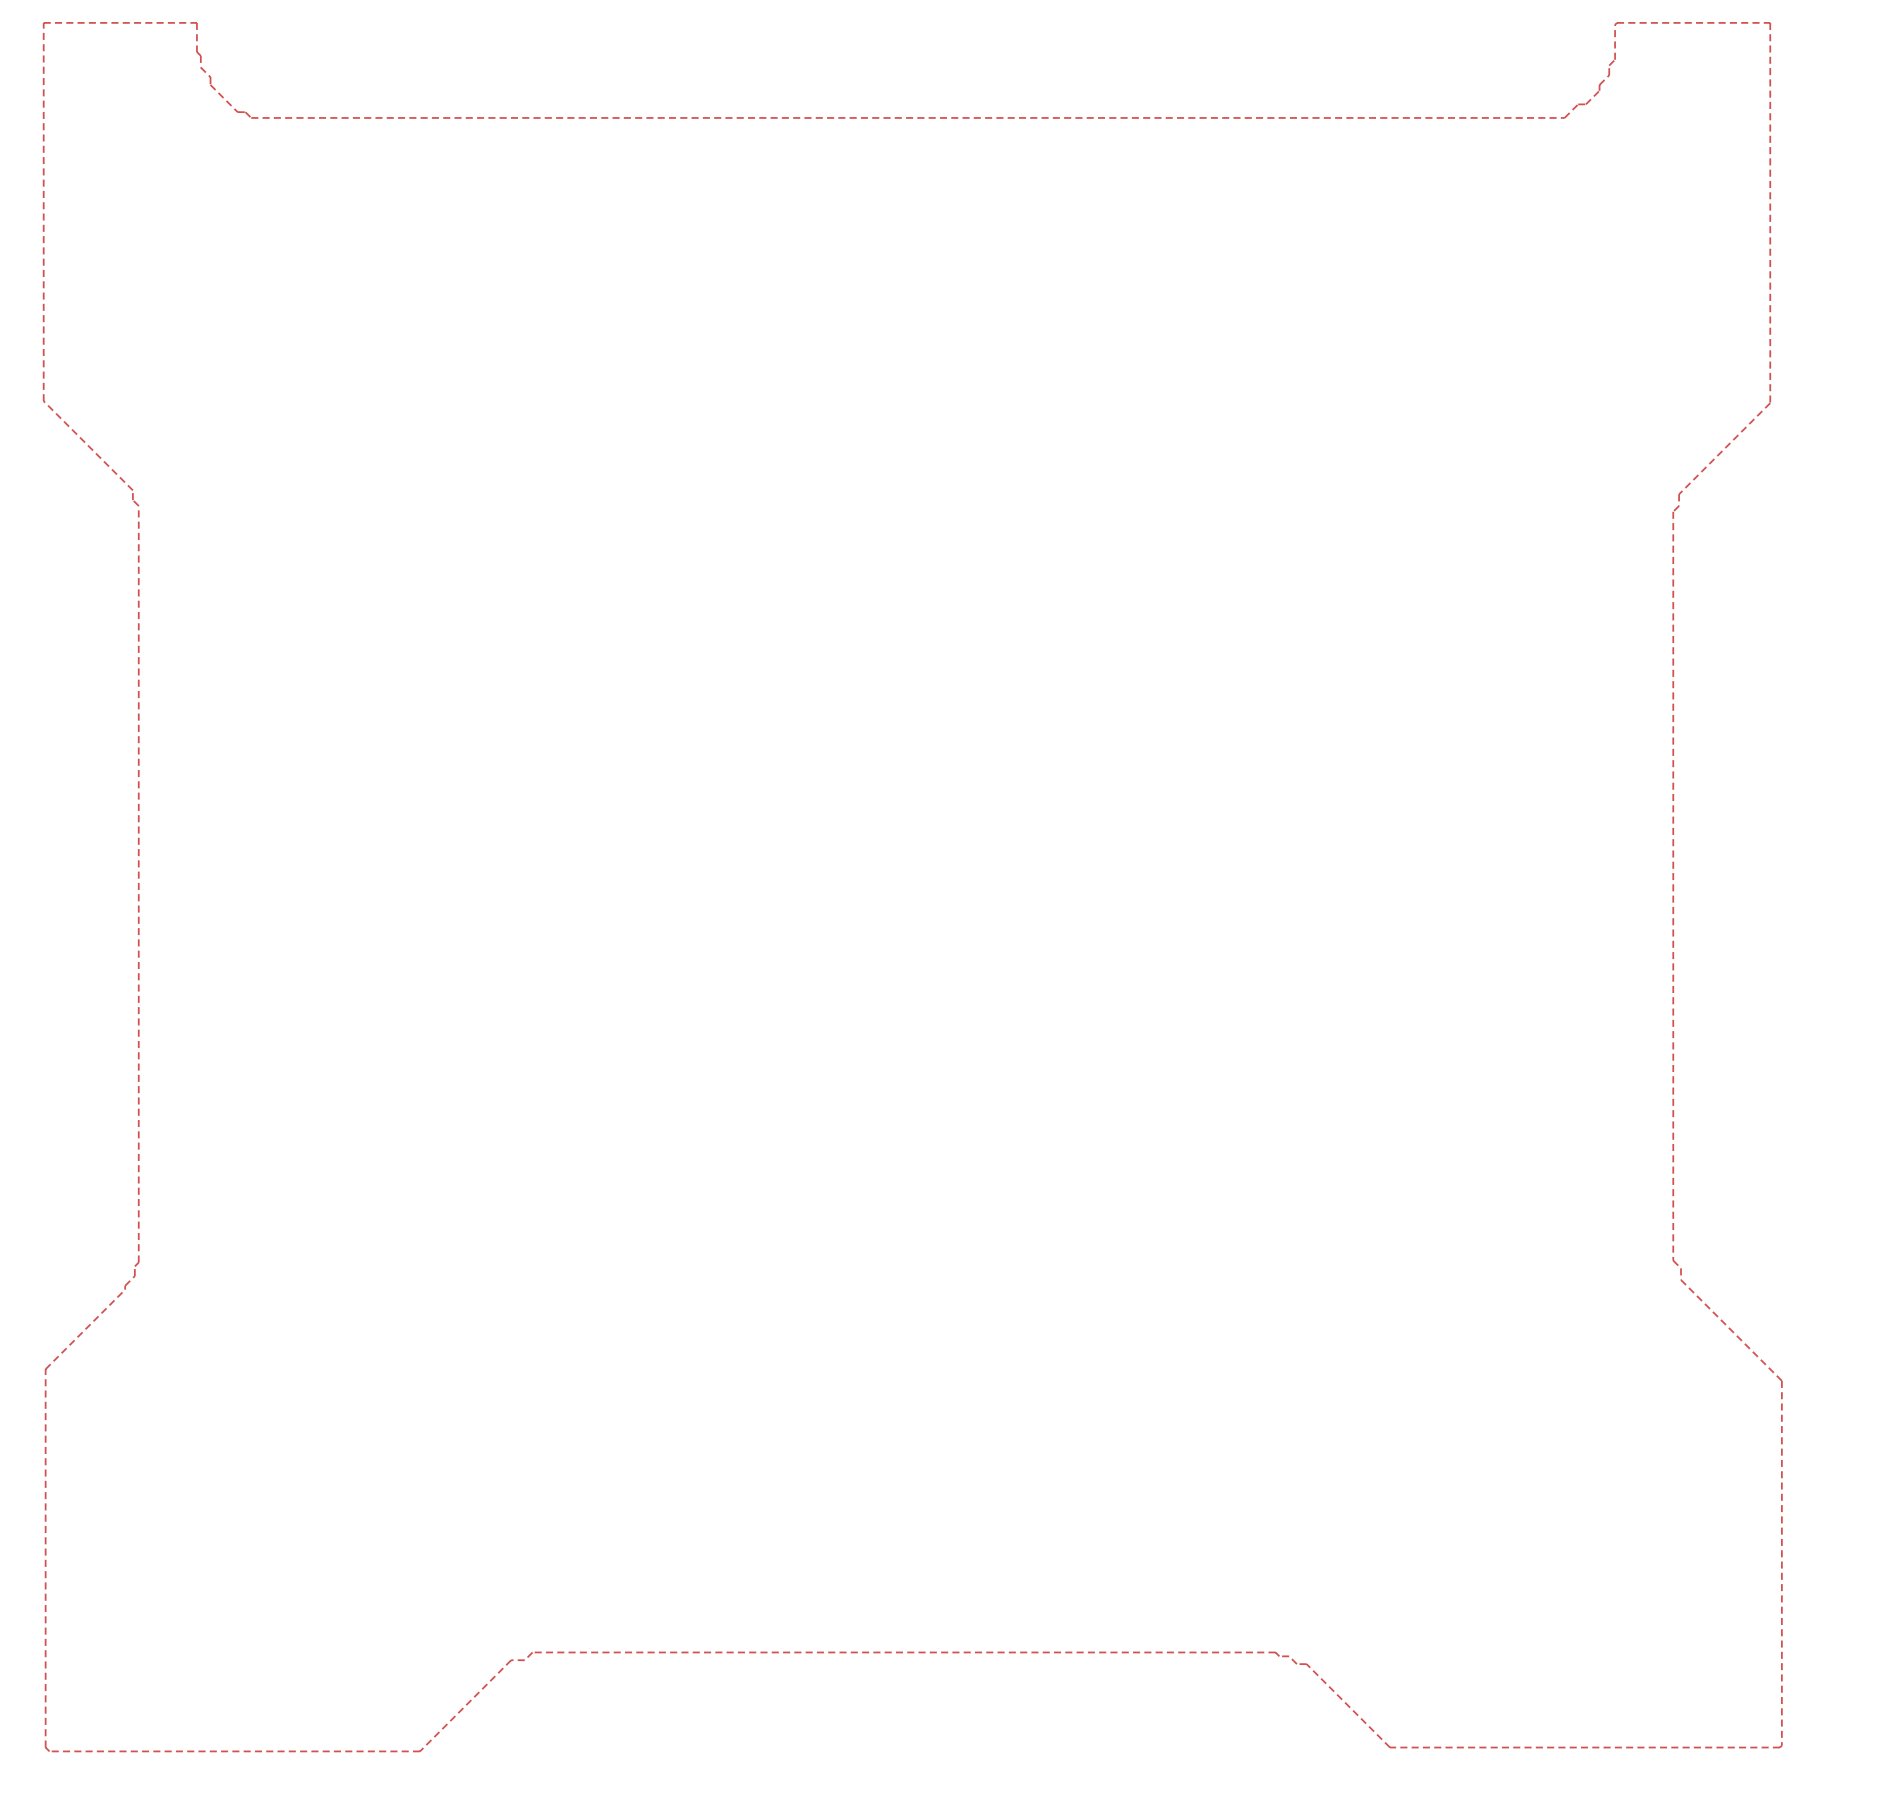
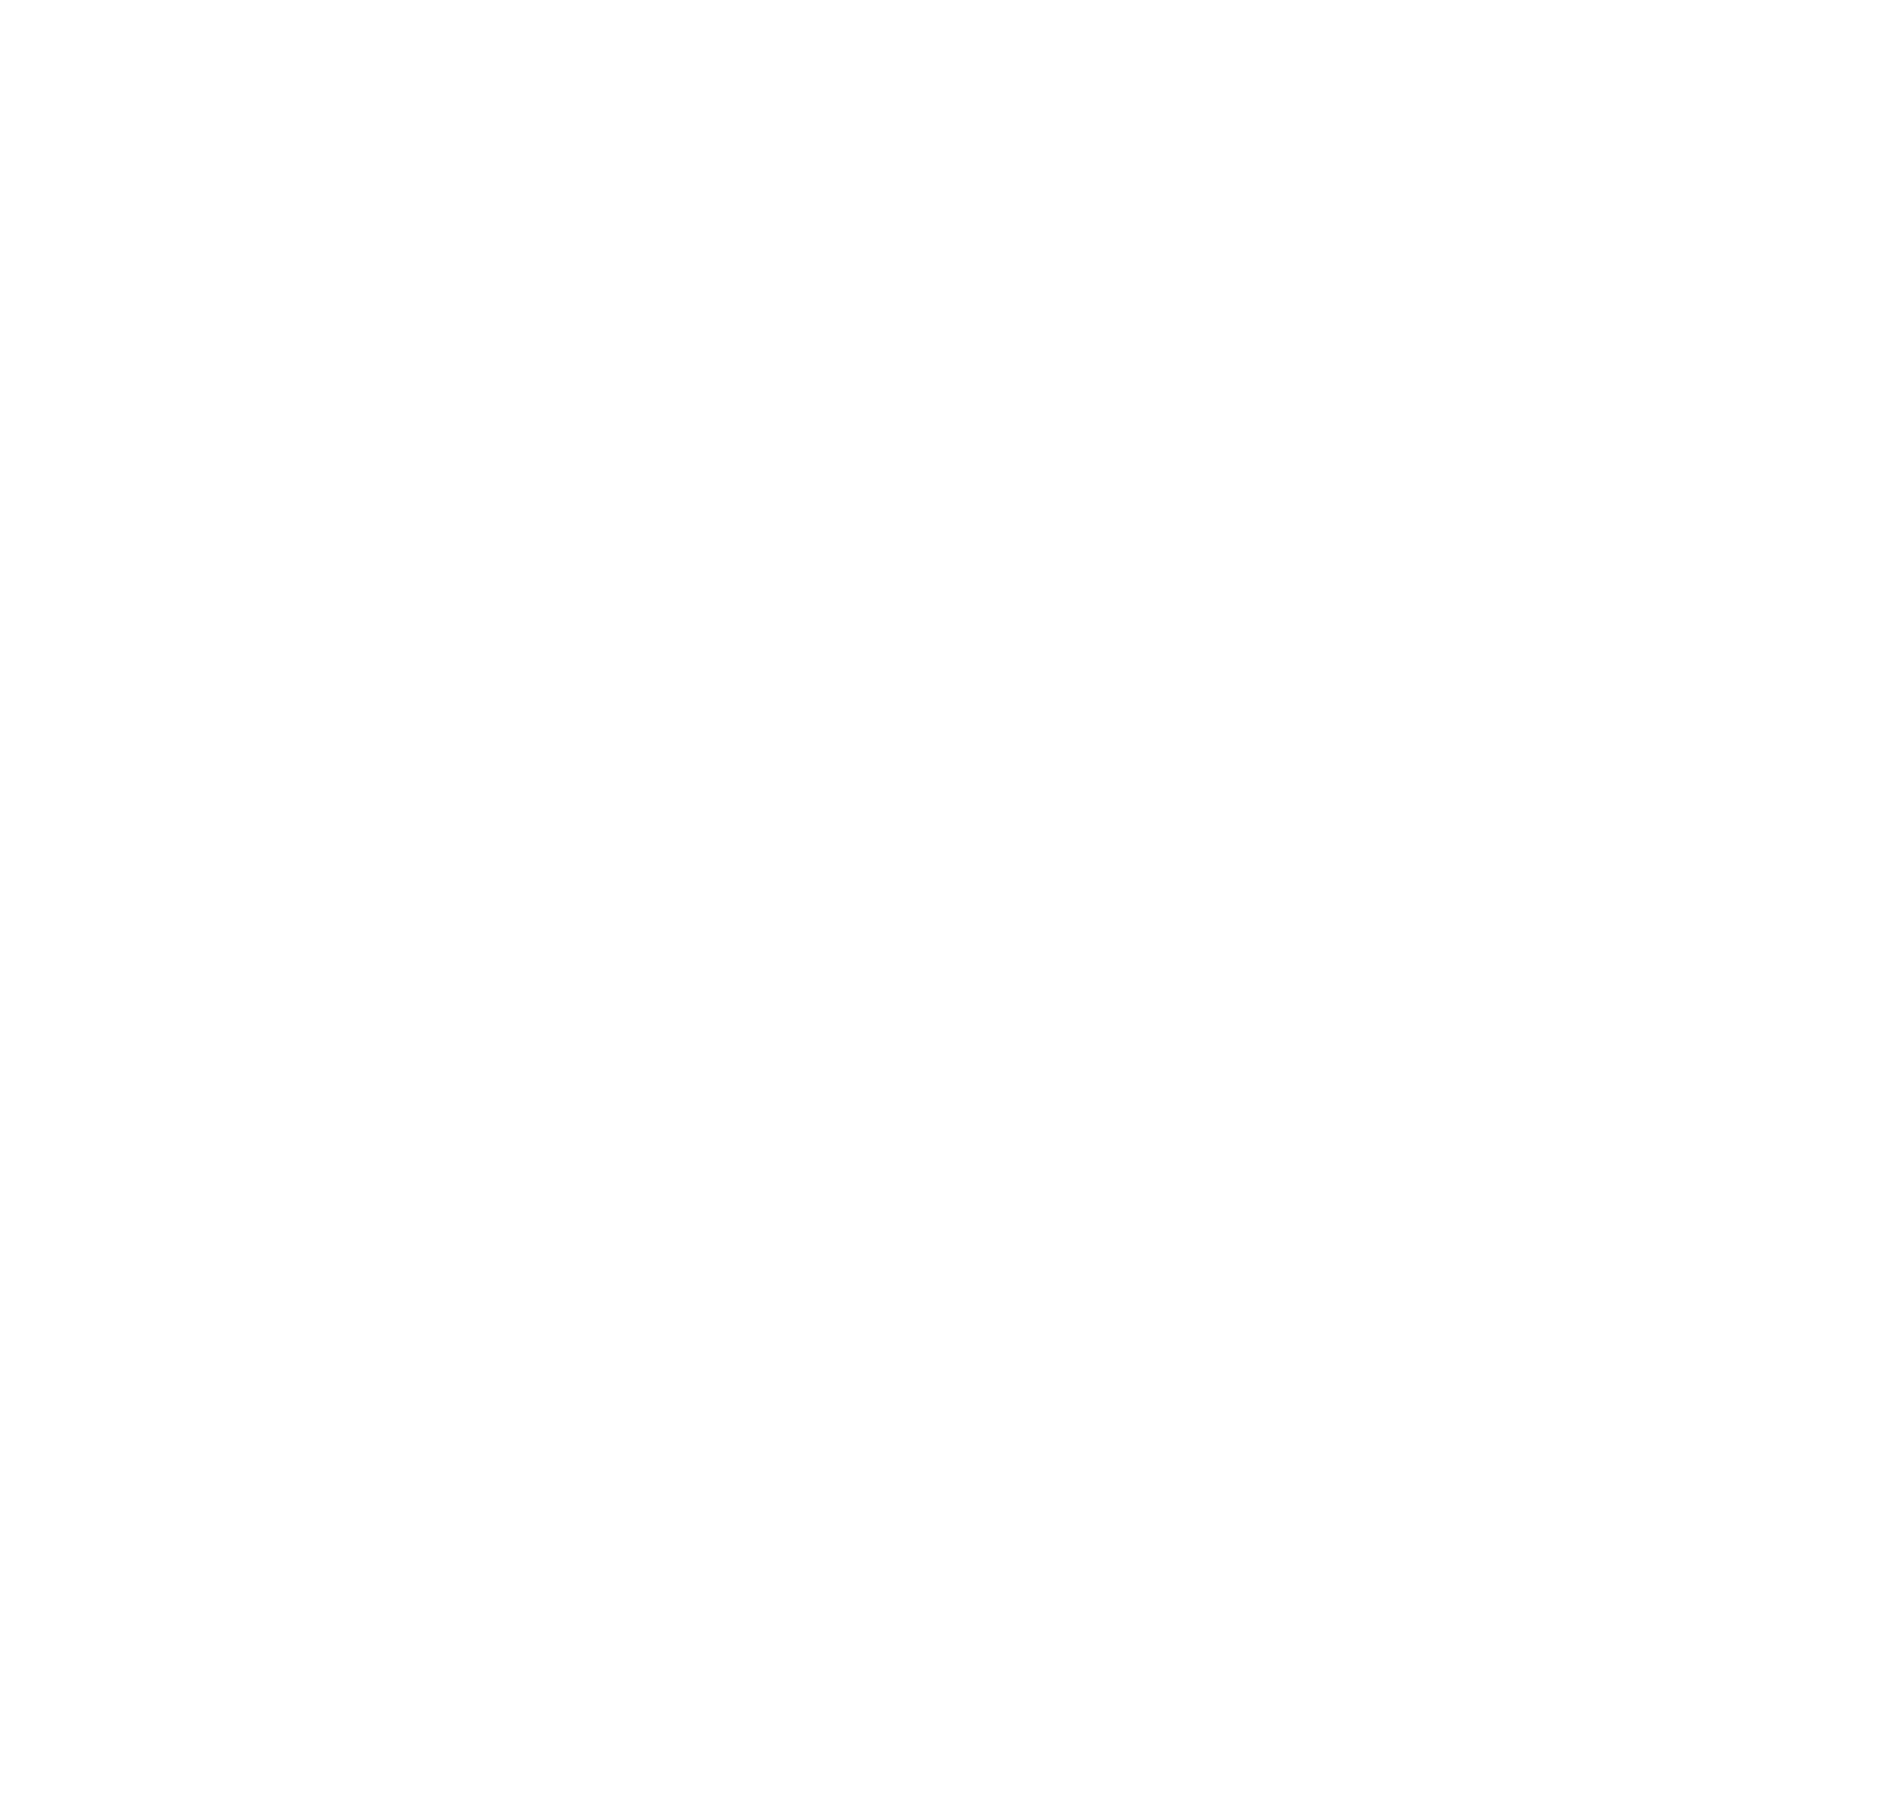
zone outline: (43, 22) (196, 22) (196, 52) (200, 55) (200, 67) (210, 77) (210, 84) (237, 112) (245, 112) (251, 117) (1564, 117) (1578, 104) (1585, 104) (1599, 90) (1599, 84) (1609, 75) (1609, 65) (1615, 59) (1615, 24) (1617, 22) (1770, 22) (1770, 403) (1679, 494) (1679, 505) (1673, 511) (1673, 1260) (1681, 1268) (1681, 1279) (1781, 1380) (1781, 1745) (1779, 1747) (1390, 1747) (1306, 1664) (1296, 1664) (1289, 1656) (1279, 1656) (1275, 1652) (532, 1652) (524, 1660) (511, 1660) (420, 1751) (49, 1751) (45, 1747) (45, 1369) (125, 1289) (125, 1285) (134, 1276) (134, 1266) (138, 1262) (138, 505) (132, 500) (132, 490) (43, 401) (43, 22) -> none

